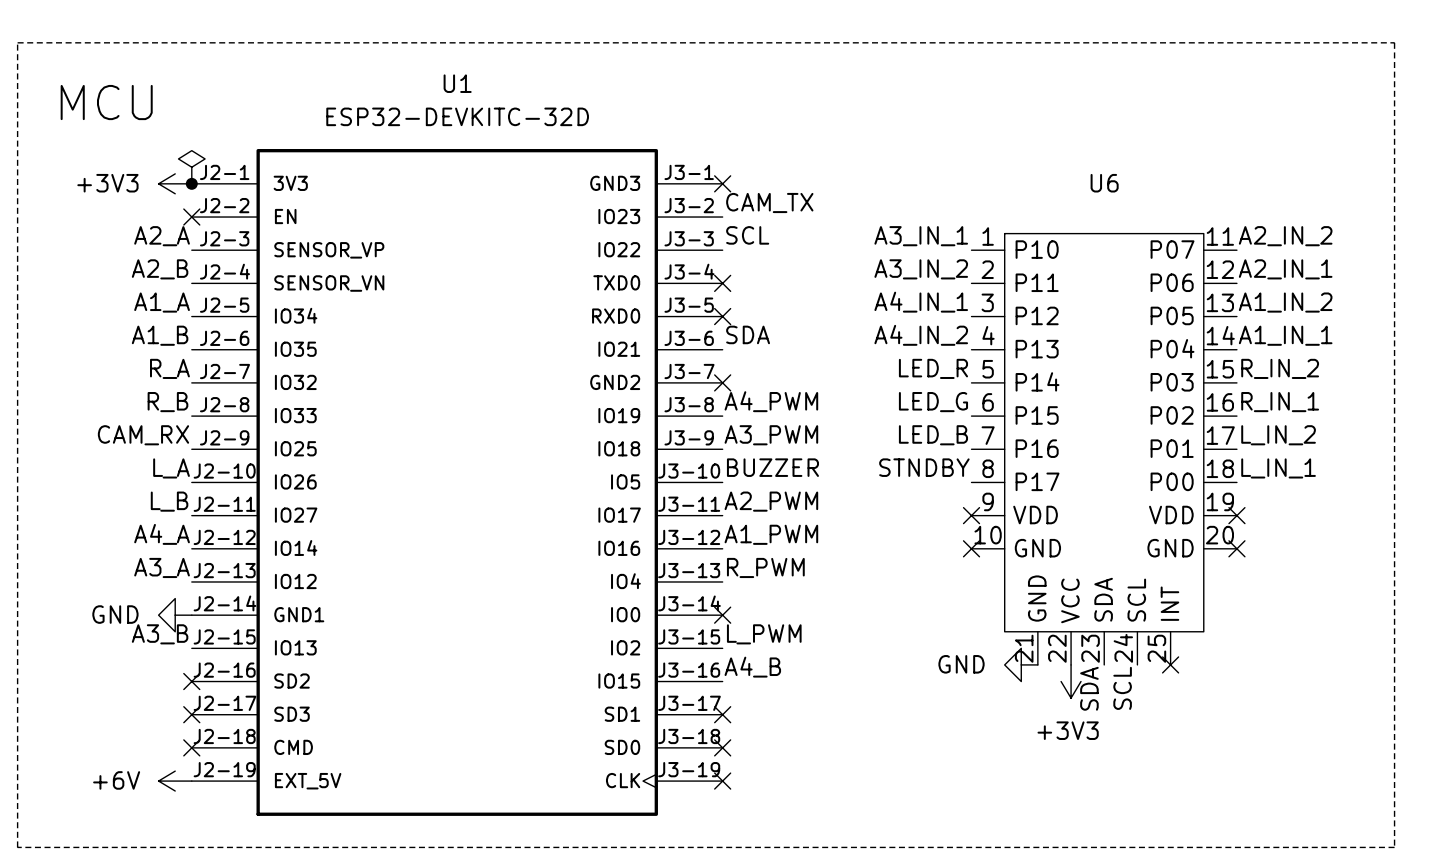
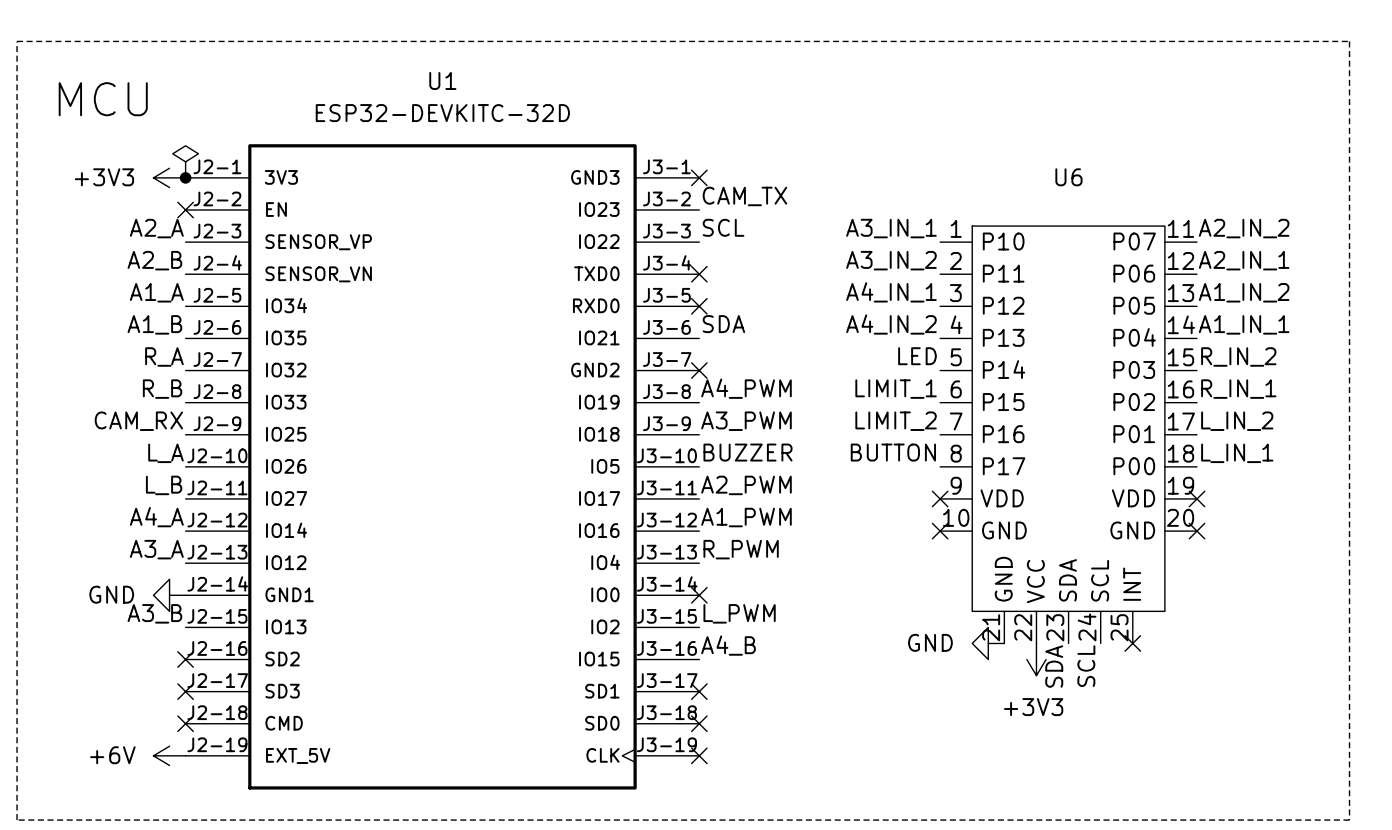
label: LED_R (933, 368) -> LED (917, 356)
label: LED_G (933, 402) -> LIMIT_1 (896, 389)
label: LED_B (933, 435) -> LIMIT_2 (896, 421)
label: STNDBY (924, 467) -> BUTTON (893, 452)

